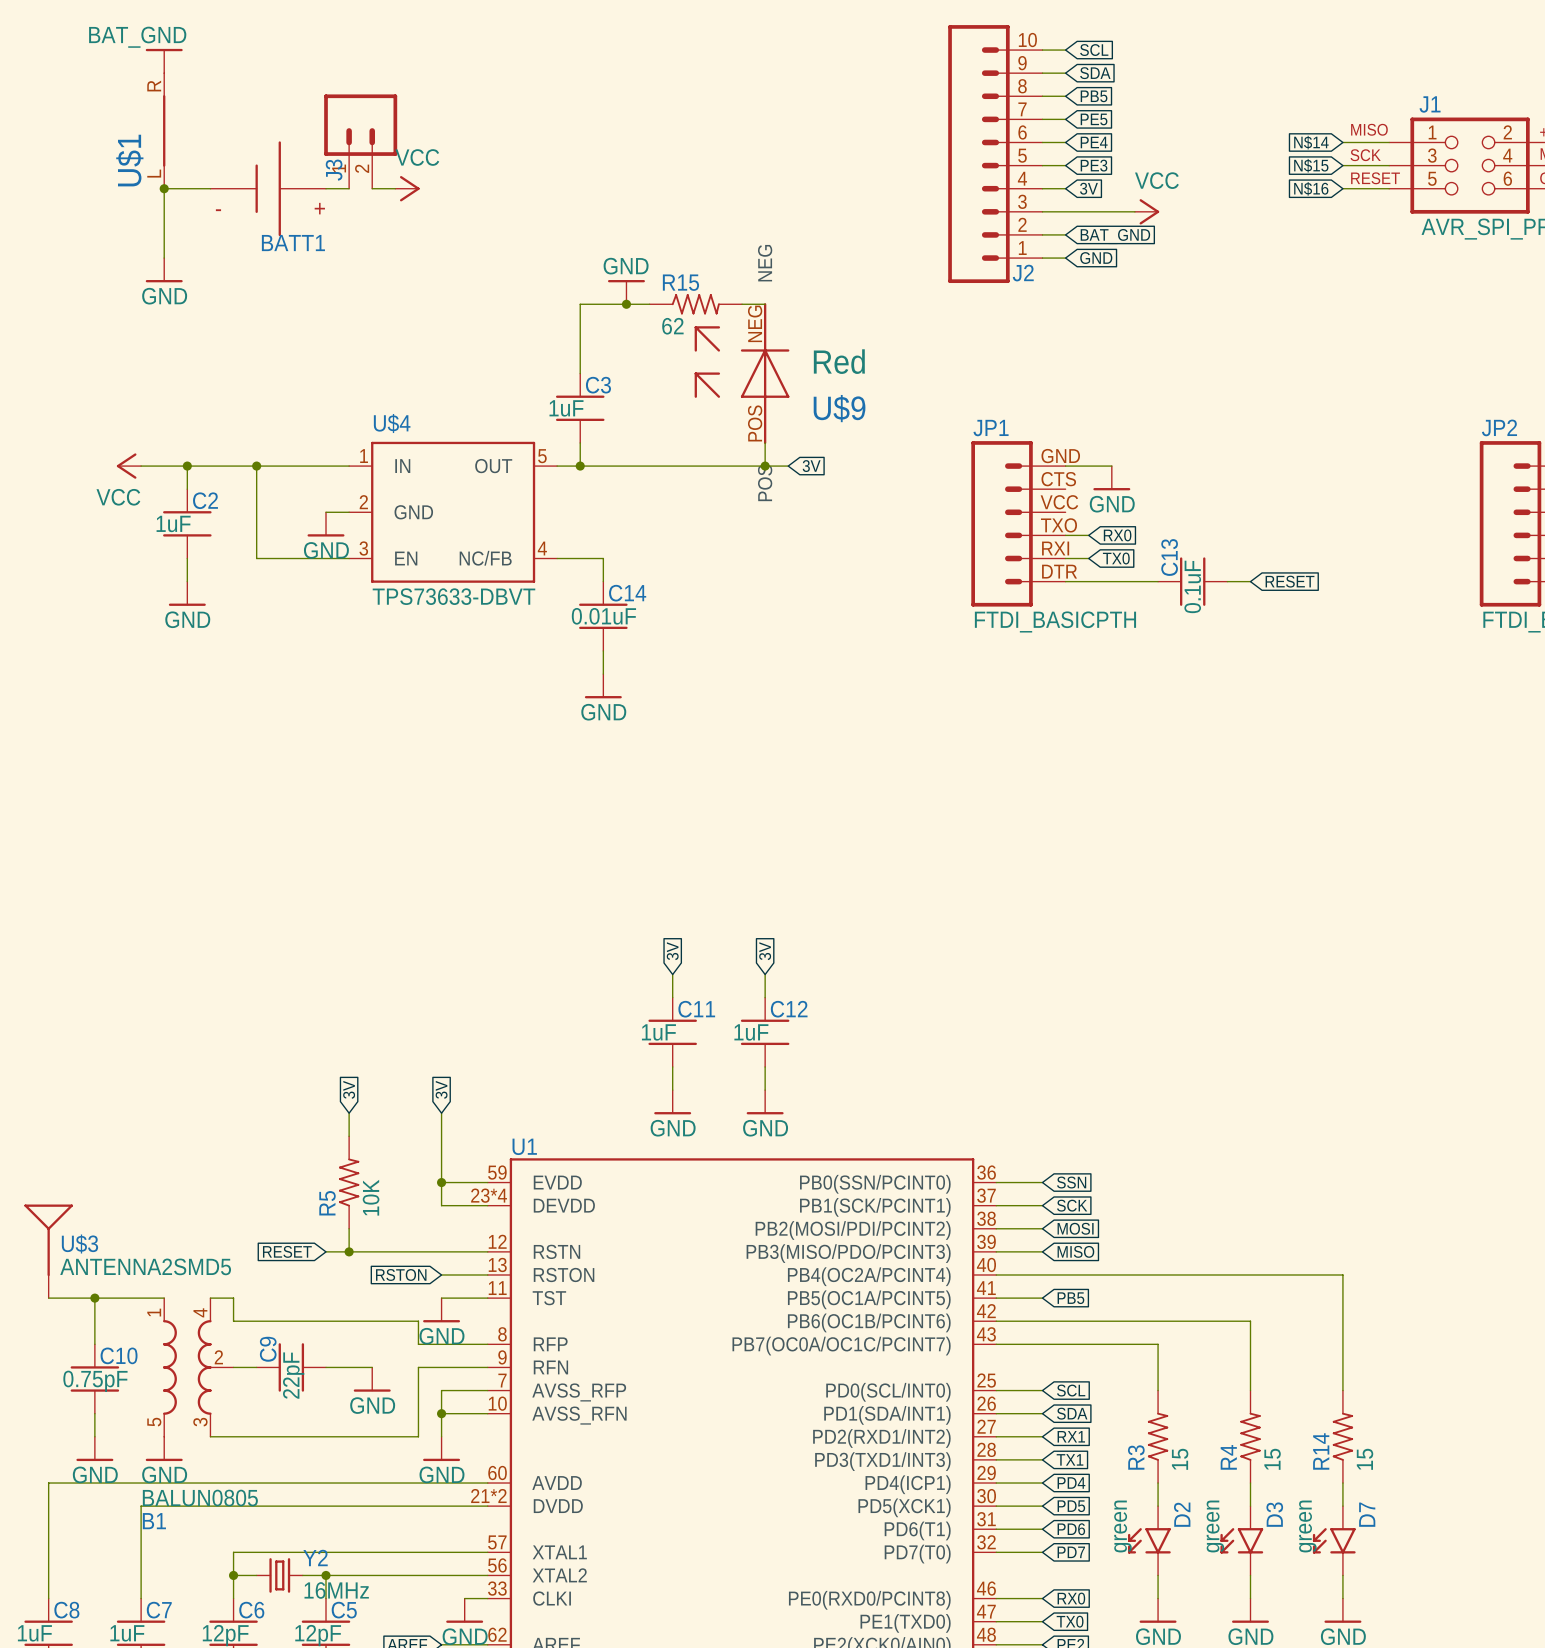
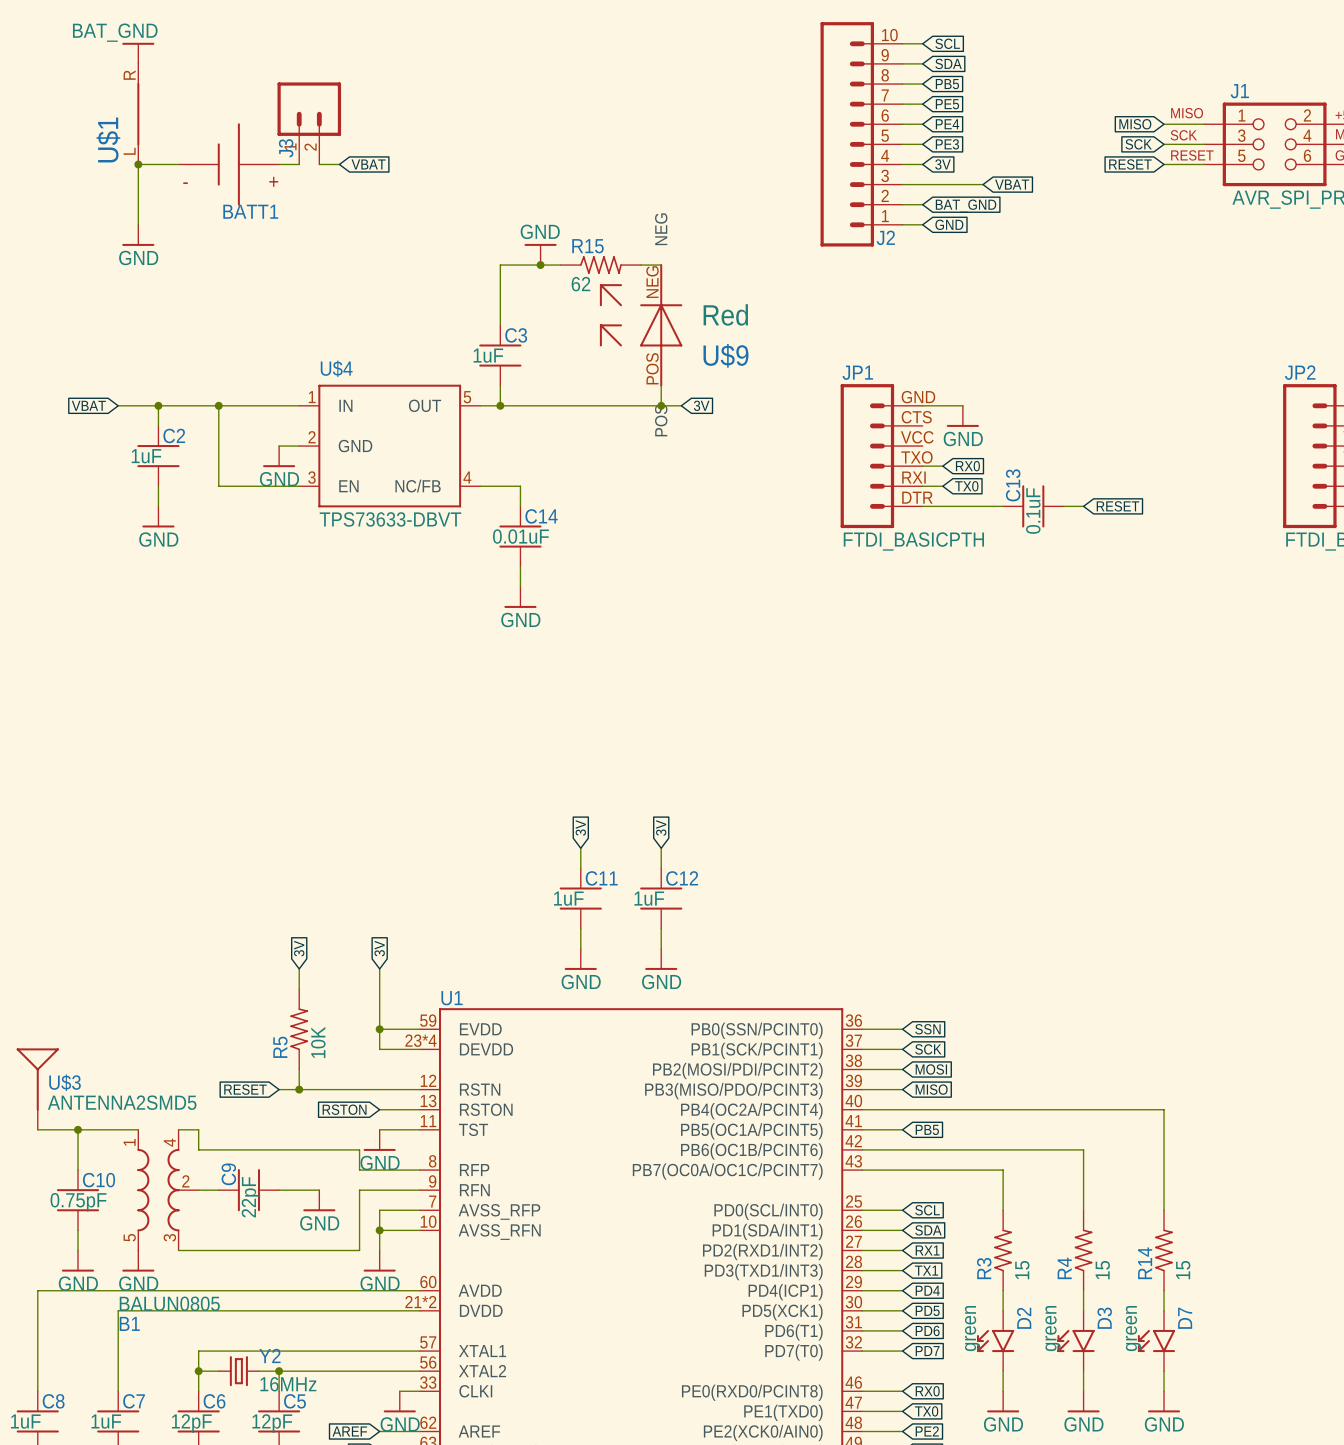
global label: N$14 (1311, 142) -> MISO (1135, 124)
global label: N$15 (1311, 165) -> SCK (1138, 144)
power symbol: VCC (407, 188) -> none
global label: none -> VBAT (368, 164)
global label: N$16 (1311, 188) -> RESET (1130, 164)
power symbol: VCC (1147, 211) -> none
global label: none -> VBAT (1012, 184)
global label: none -> VBAT (88, 405)
power symbol: VCC (128, 466) -> none

